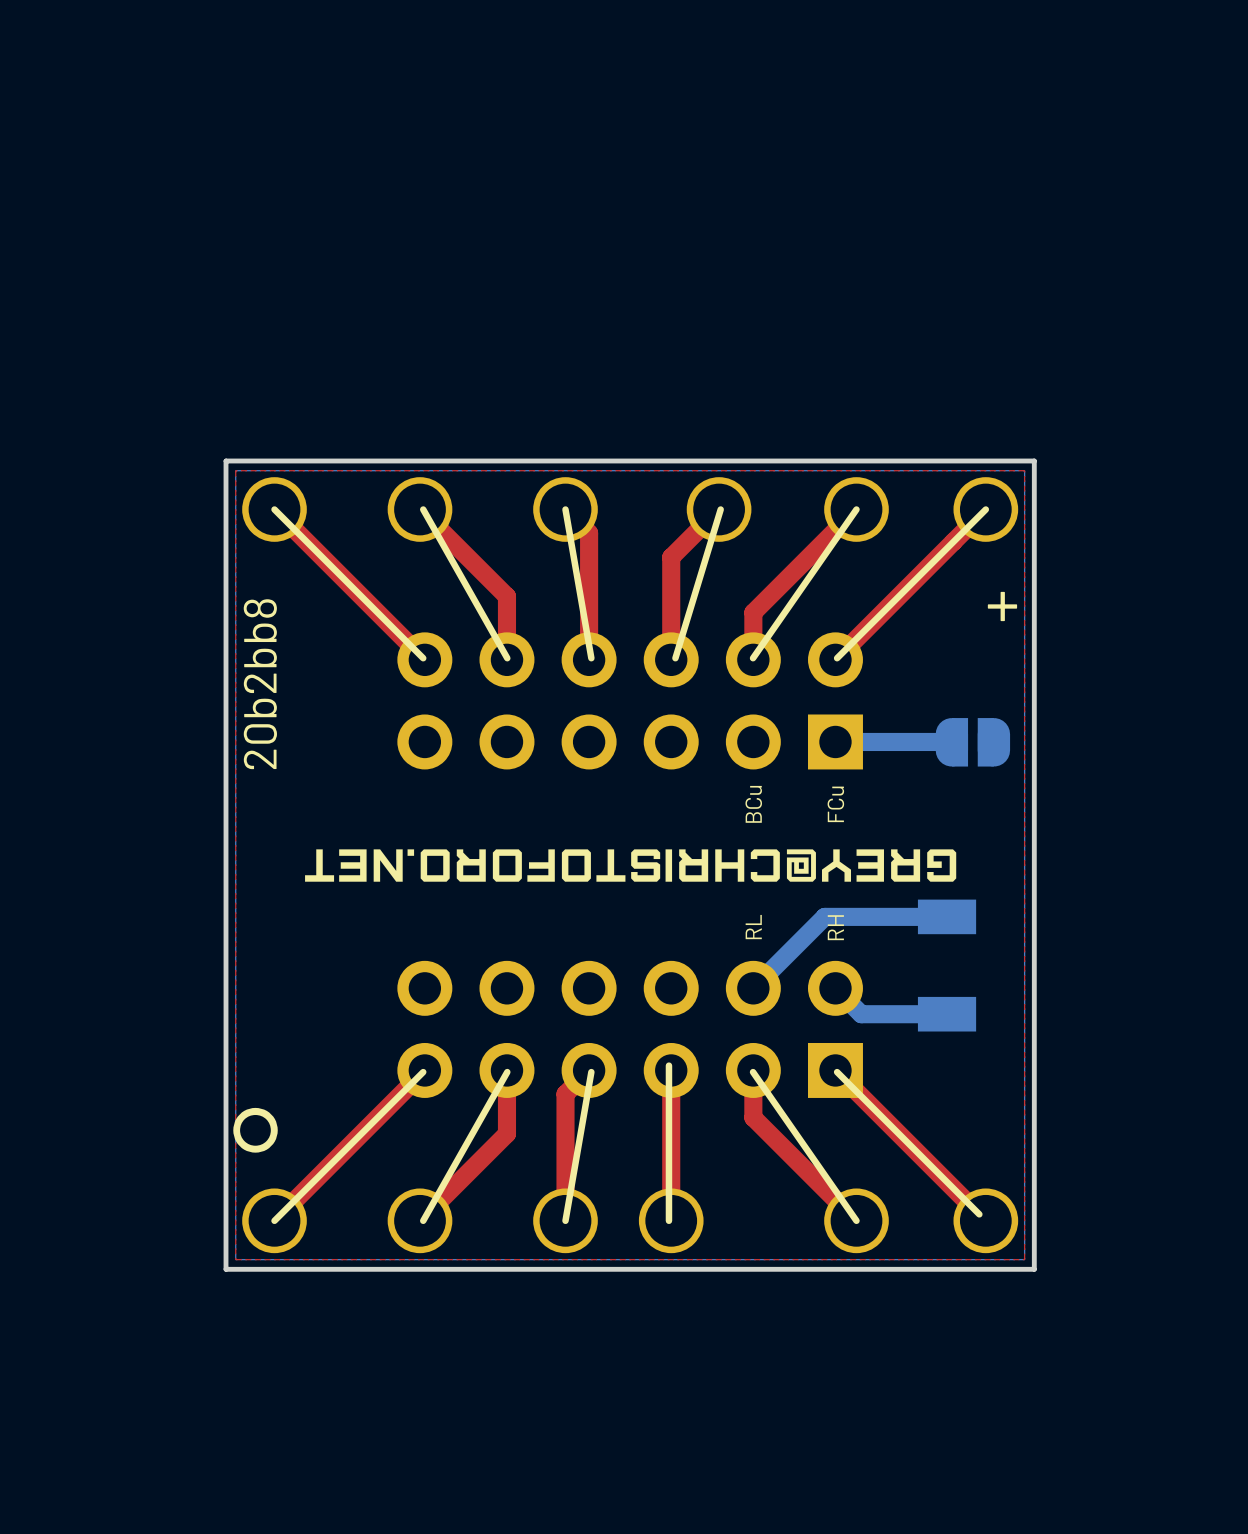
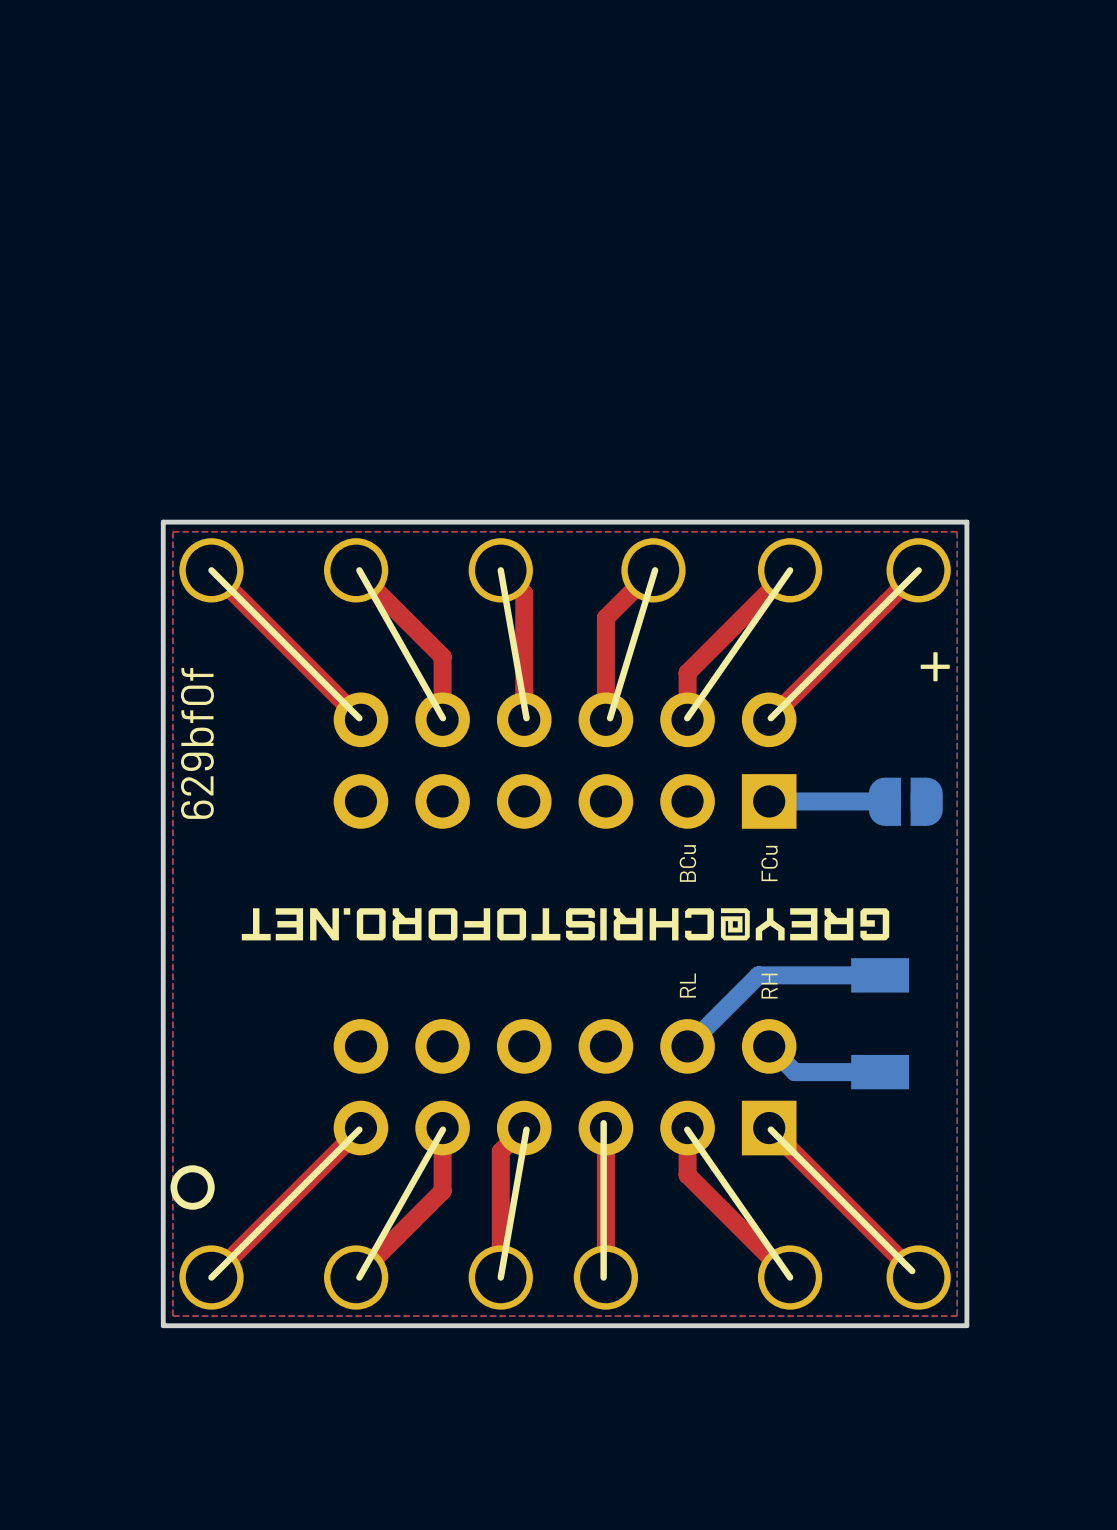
text: 20b2bb8 (260, 684) -> 629bf0f (197, 743)

